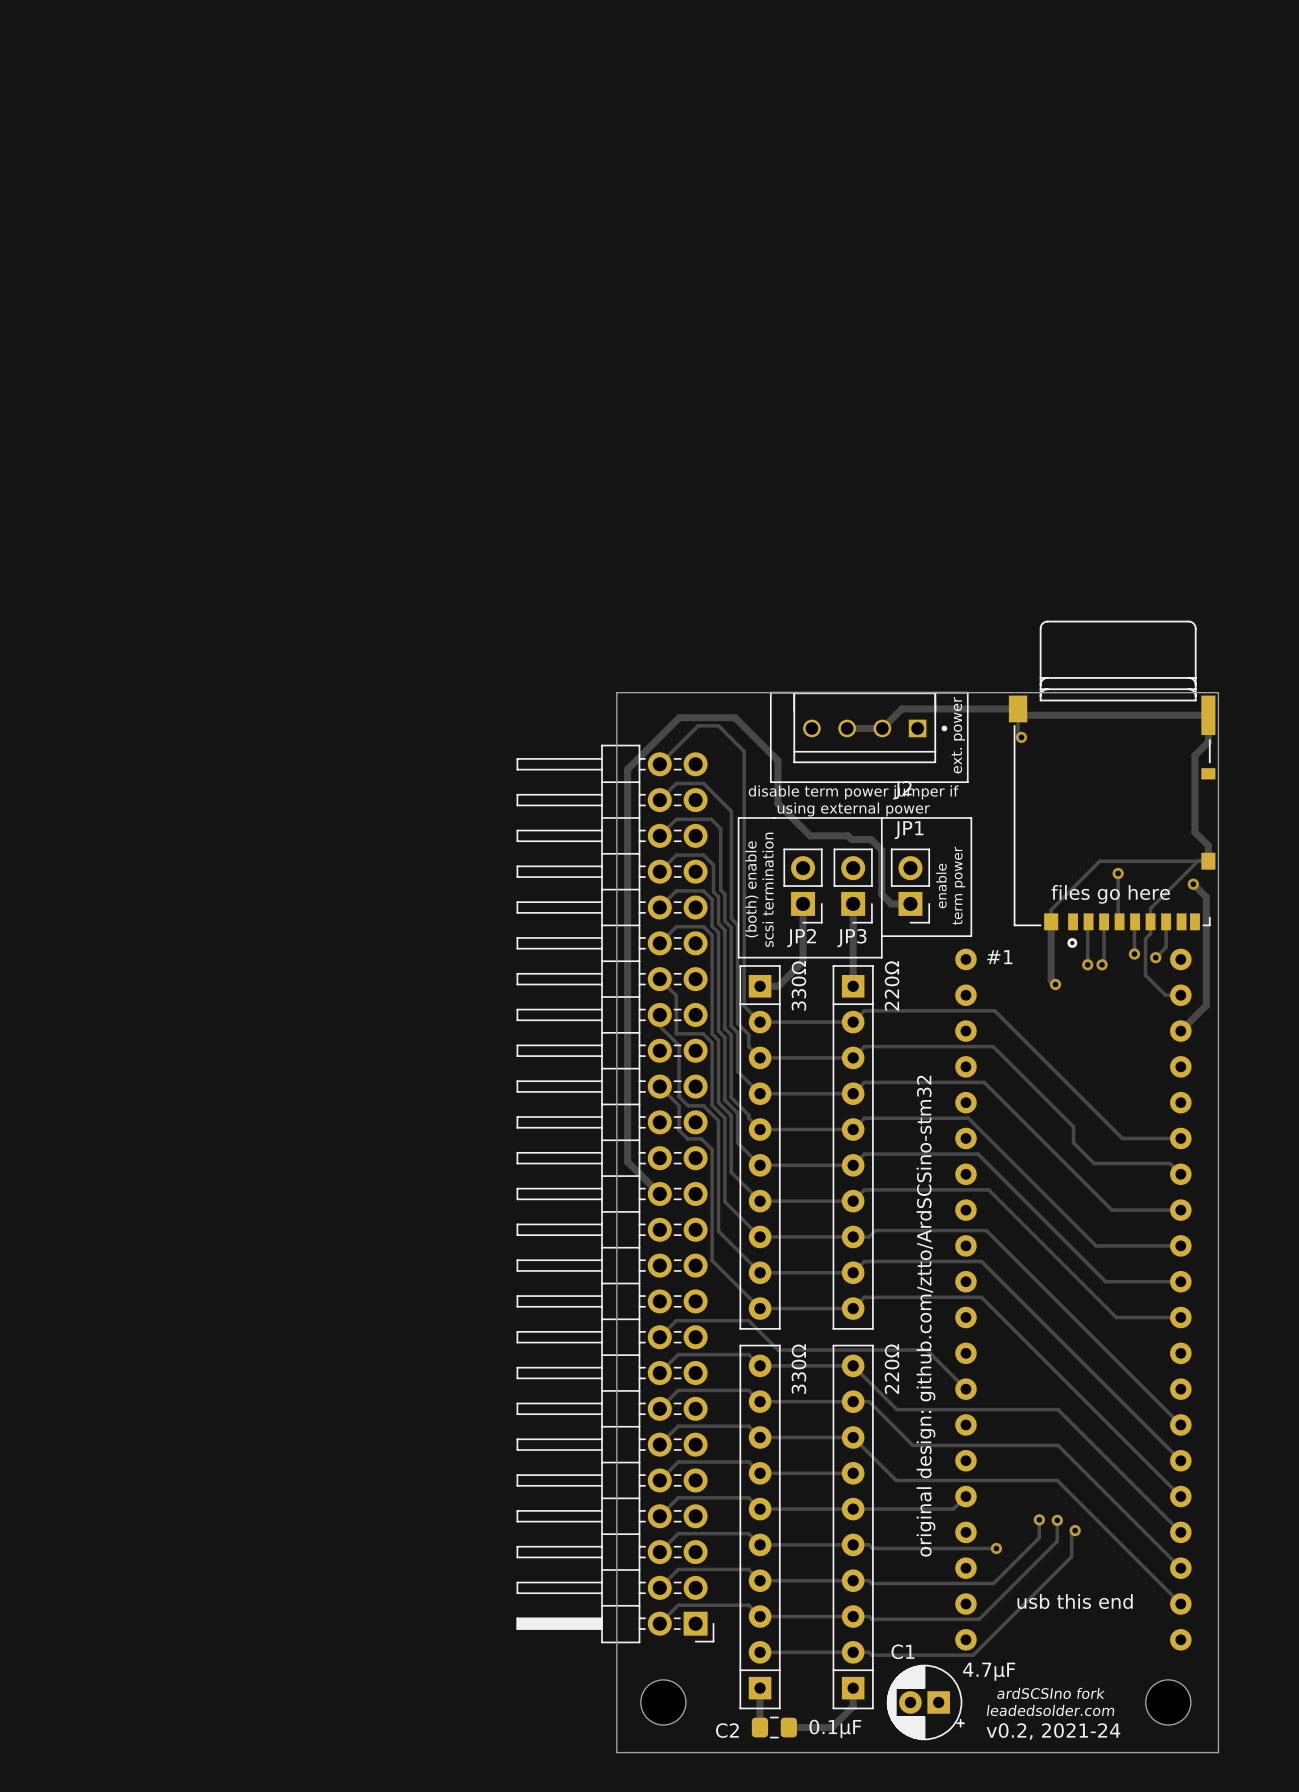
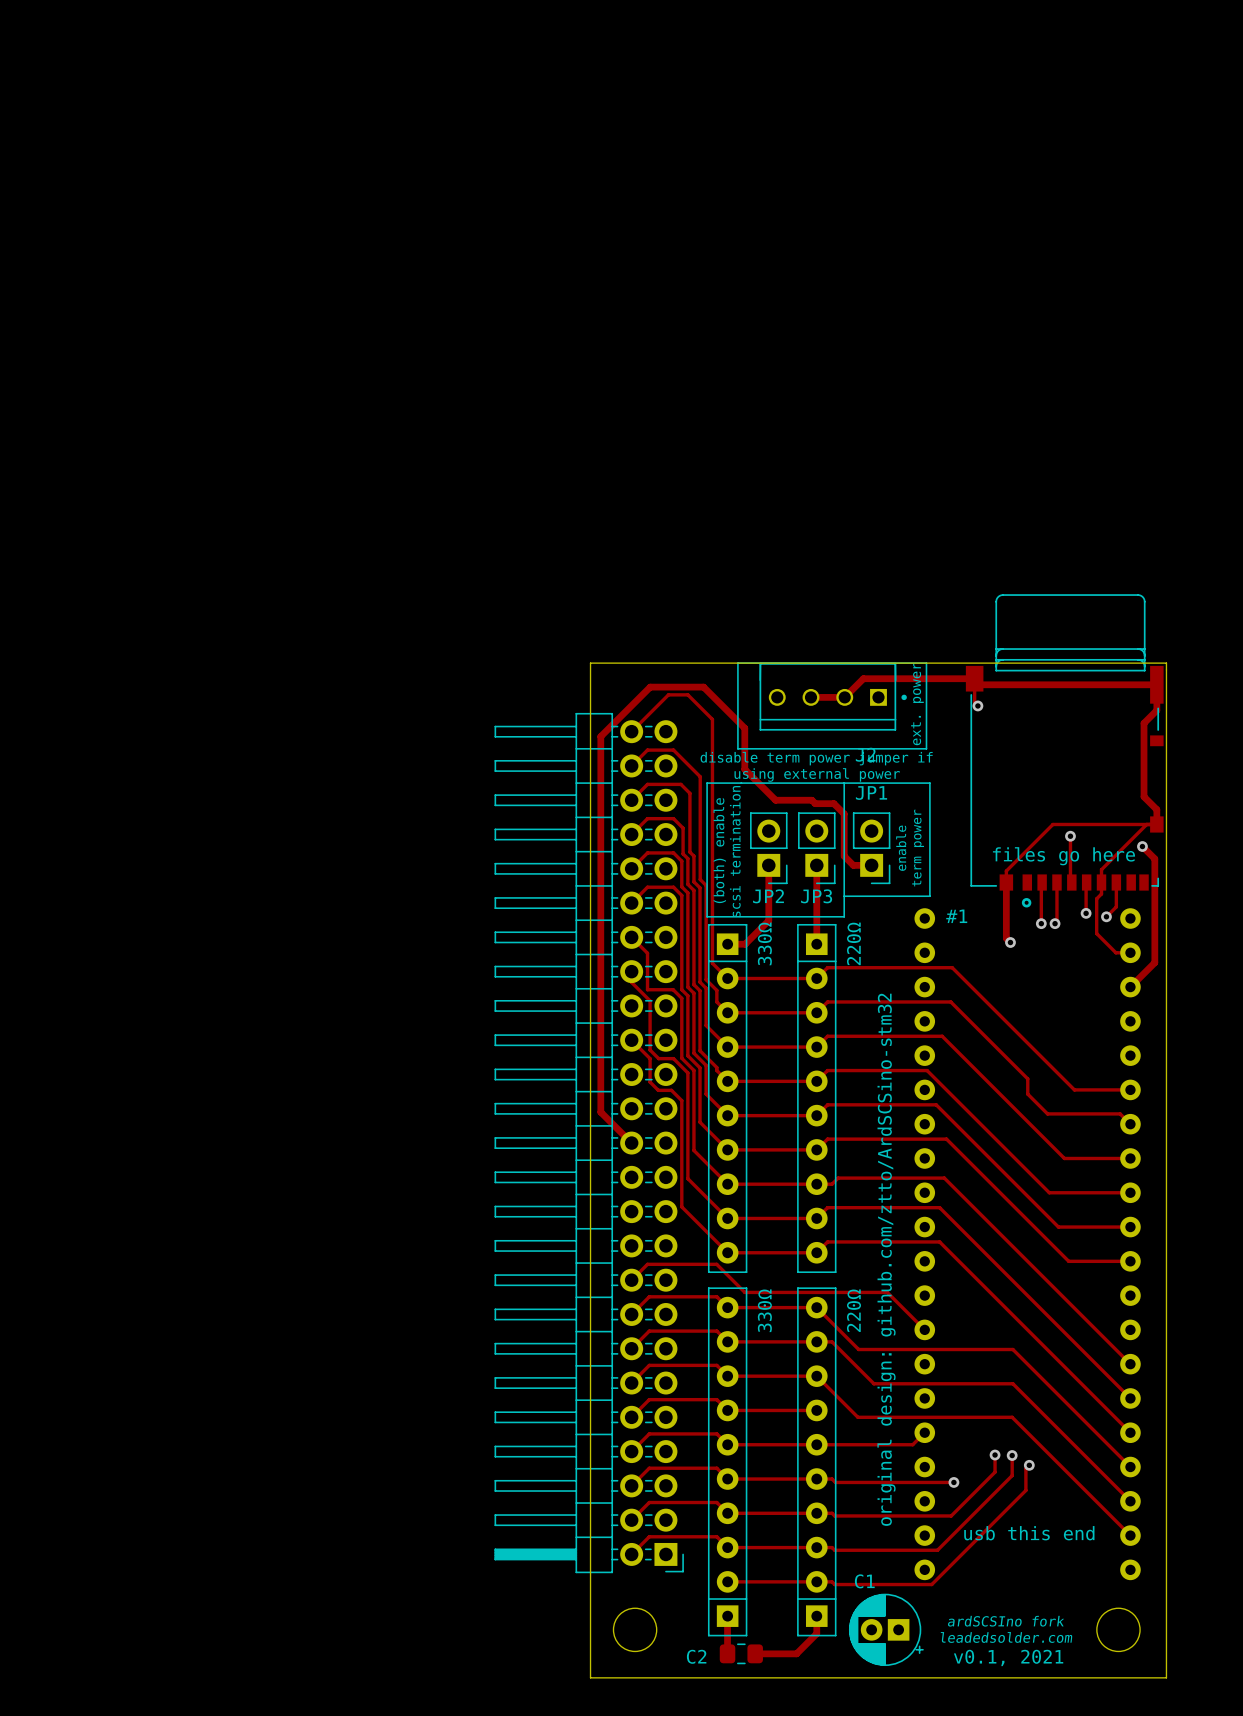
C1 value: 4.7µF (989, 1671) -> none
C2 value: 0.1µF (835, 1728) -> none
text: v0.2, 2021-24 (1053, 1731) -> v0.1, 2021 (1008, 1657)

